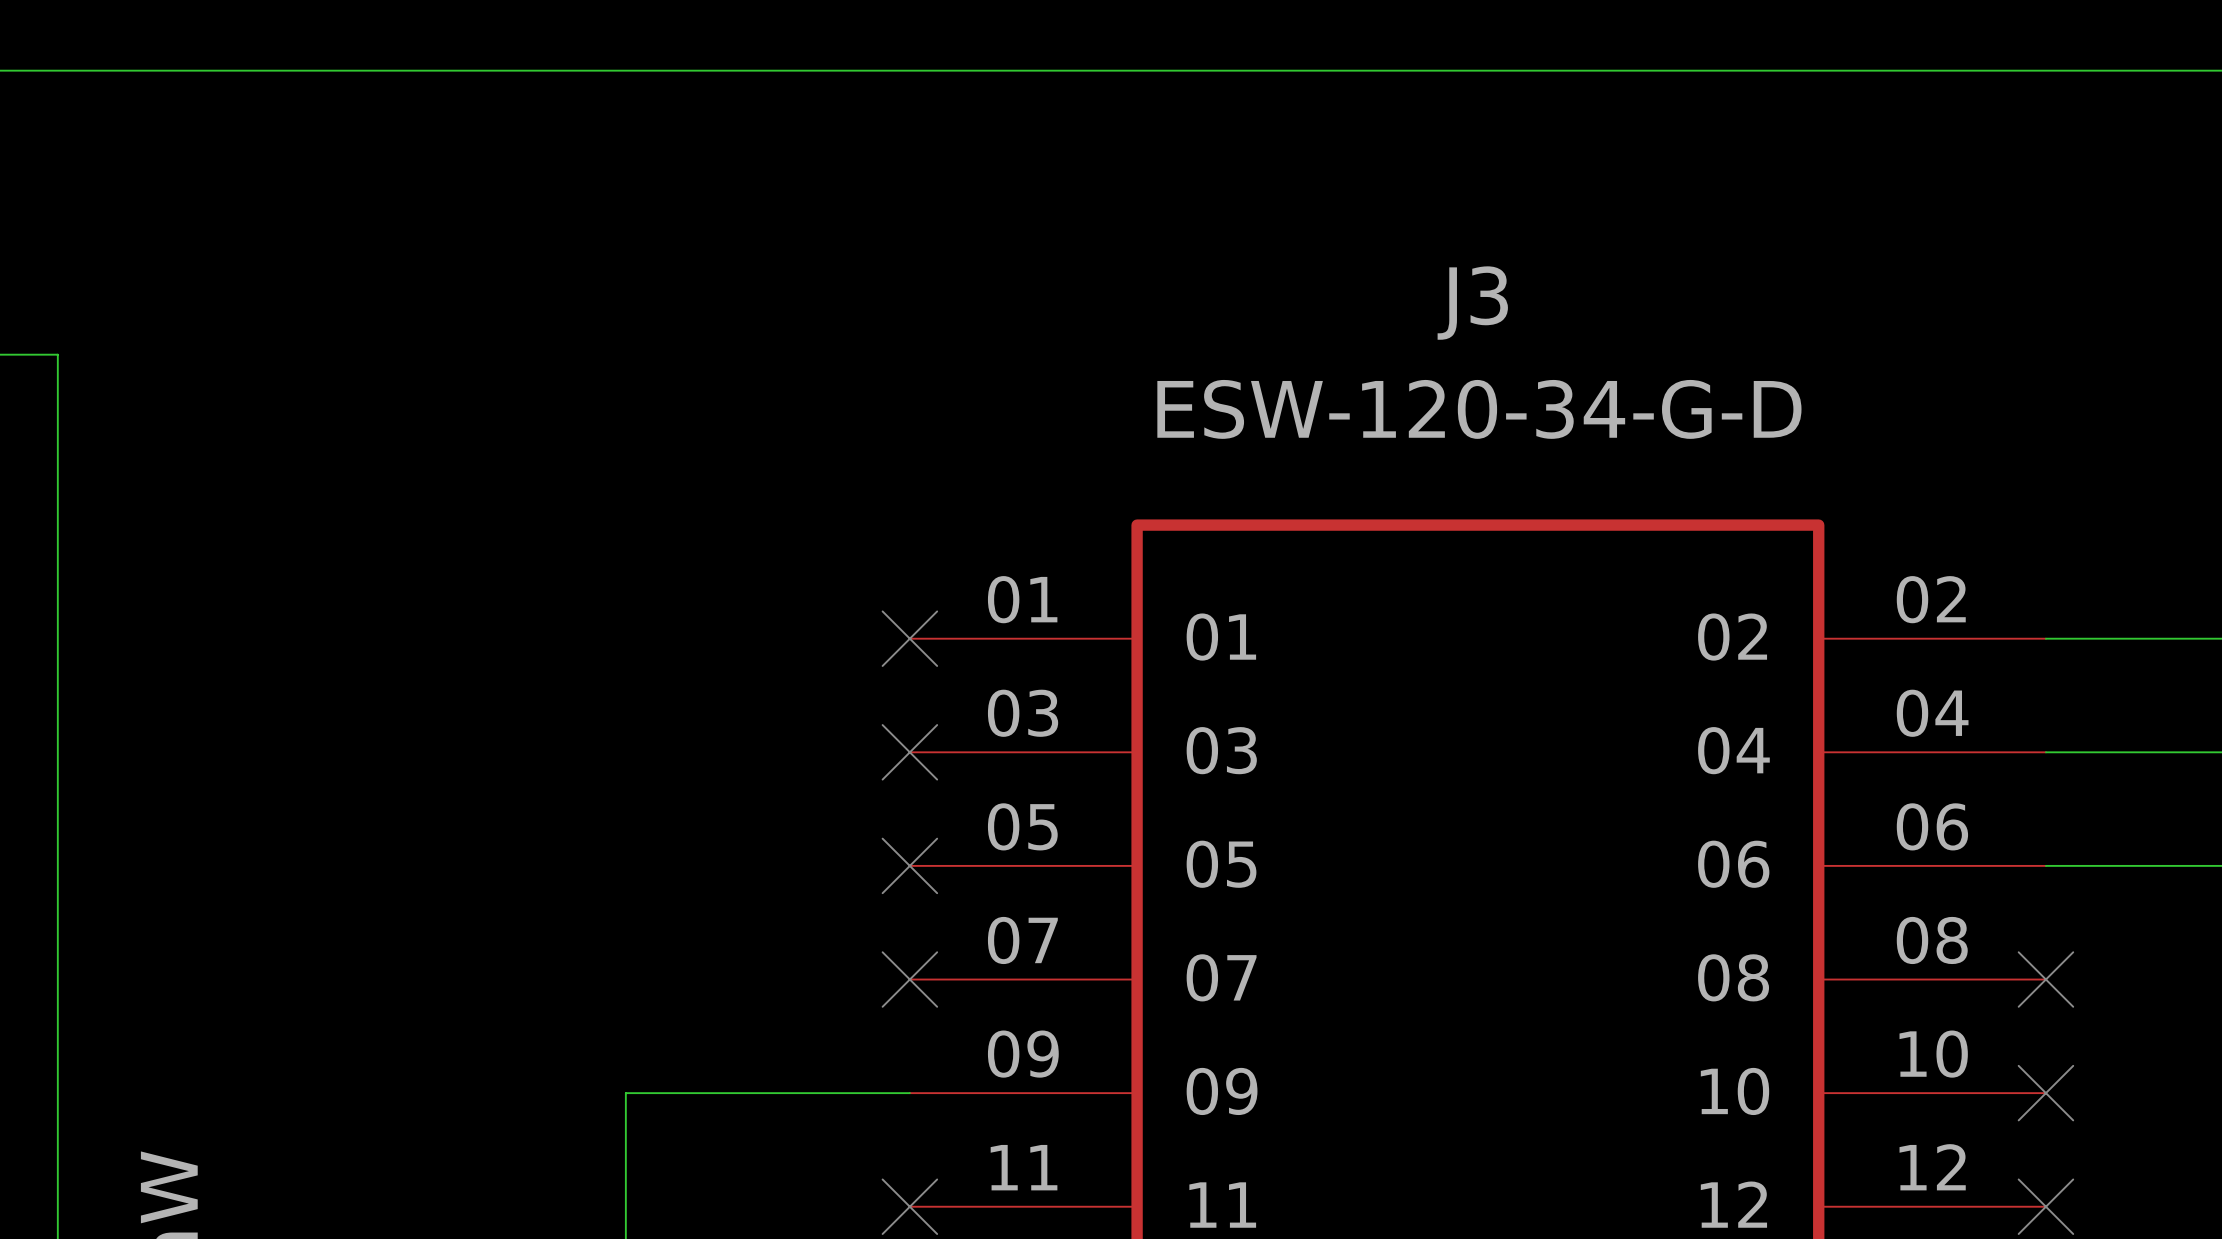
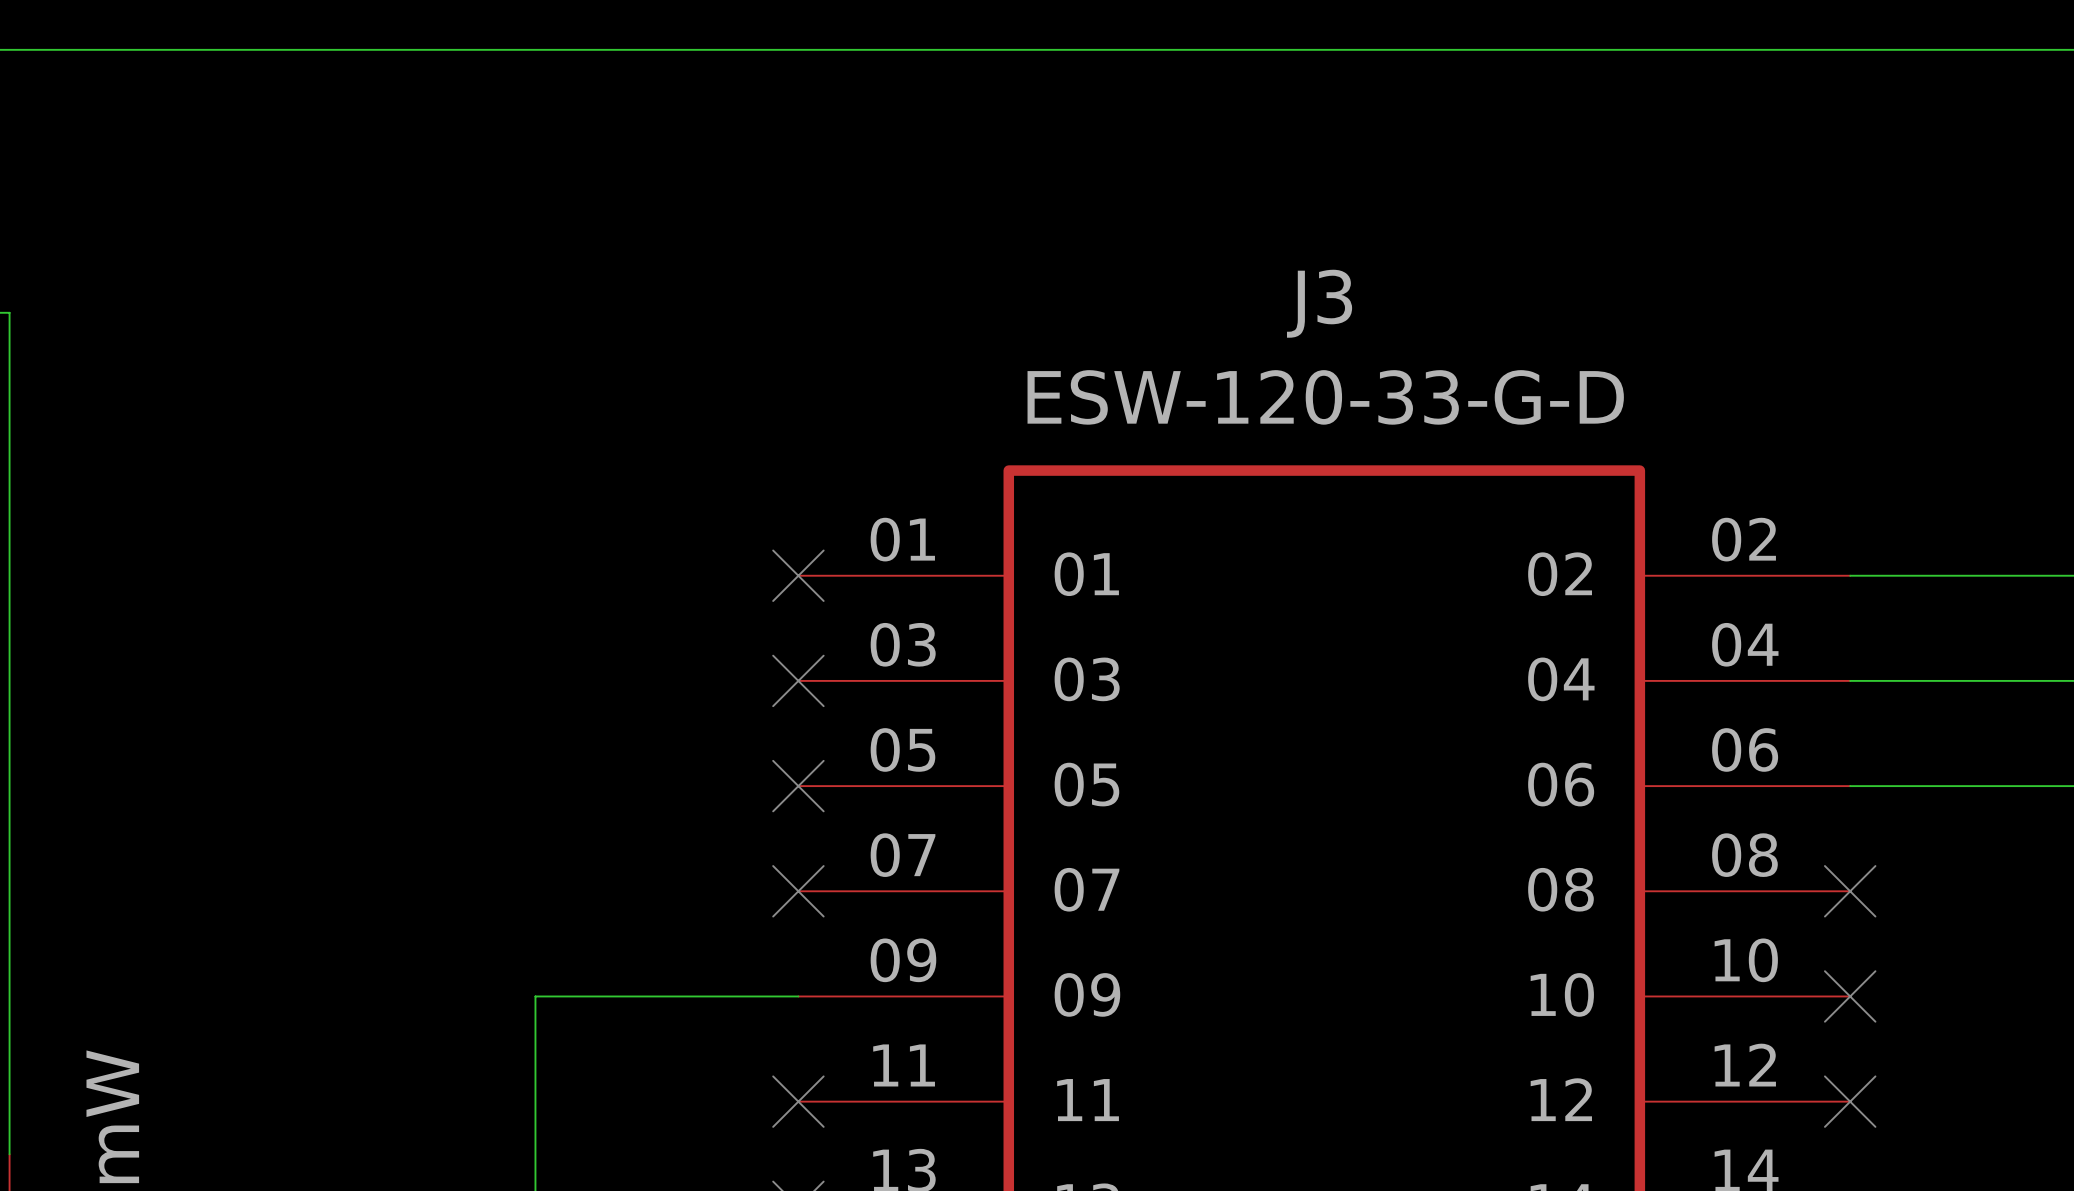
J3 name position: J3 (1472, 303) -> J3 (1319, 303)
J3 value: ESW-120-34-G-D (1479, 409) -> ESW-120-33-G-D (1325, 397)

